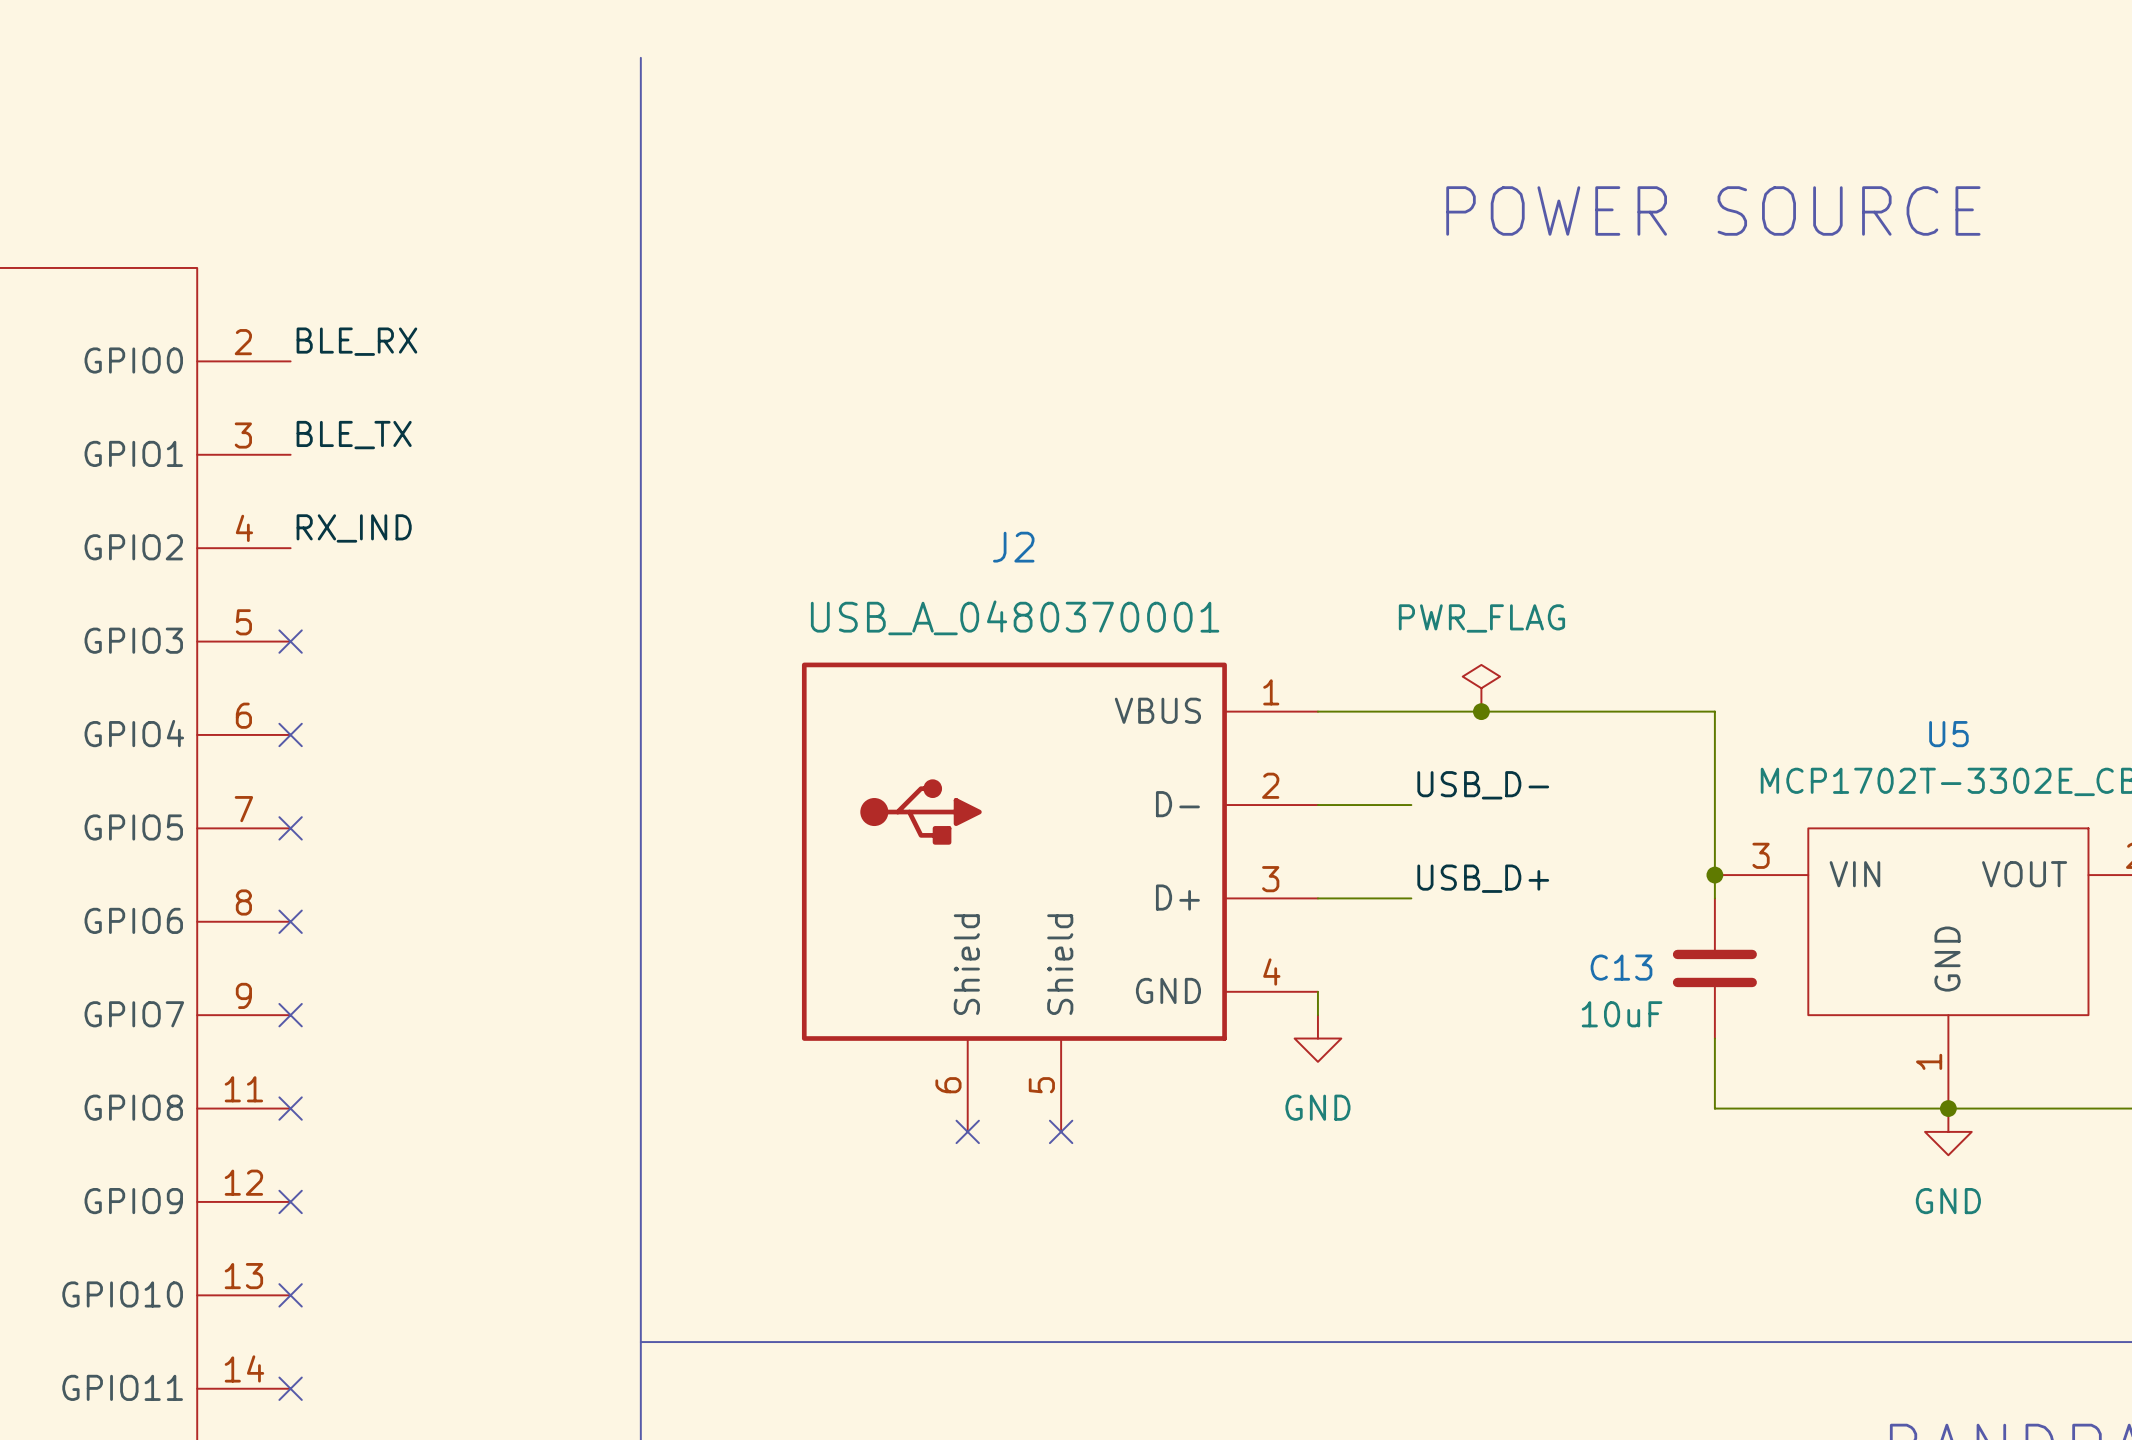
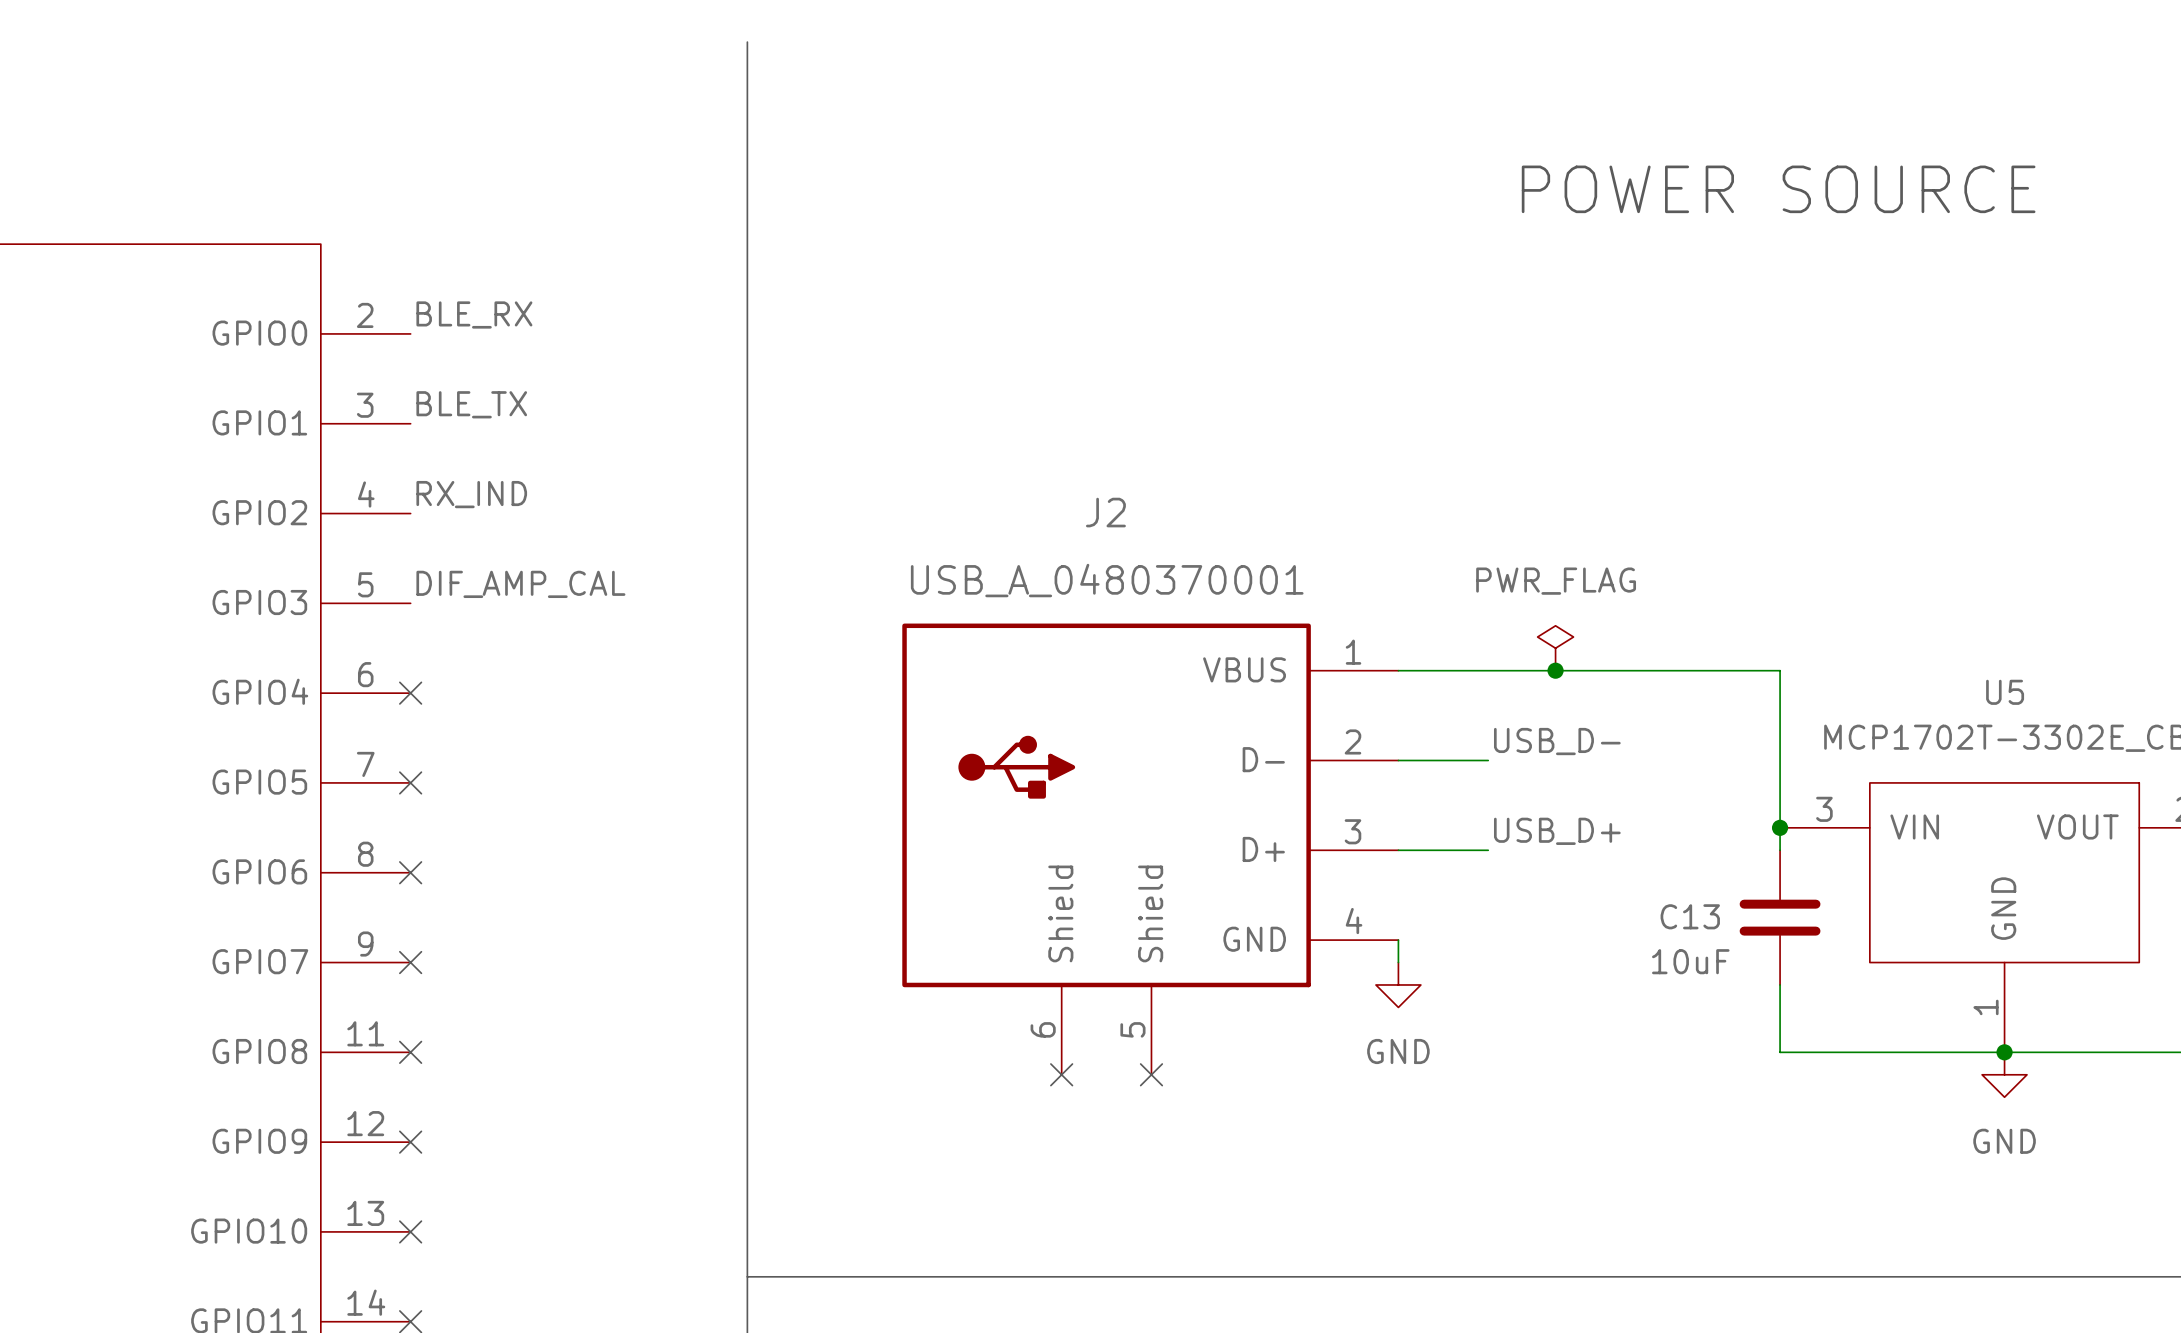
label: none -> DIF_AMP_CAL (520, 584)
no-connect mark: (290, 641) -> none

